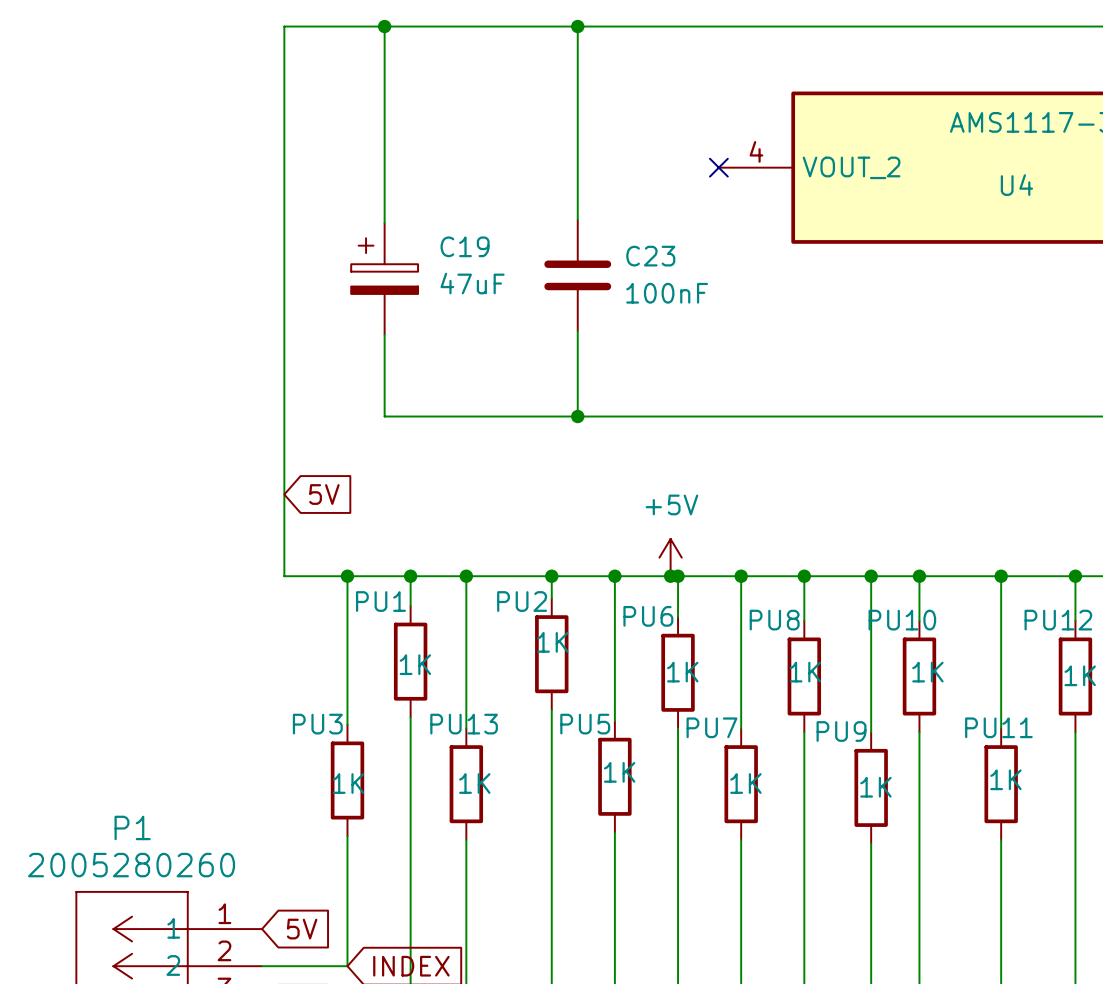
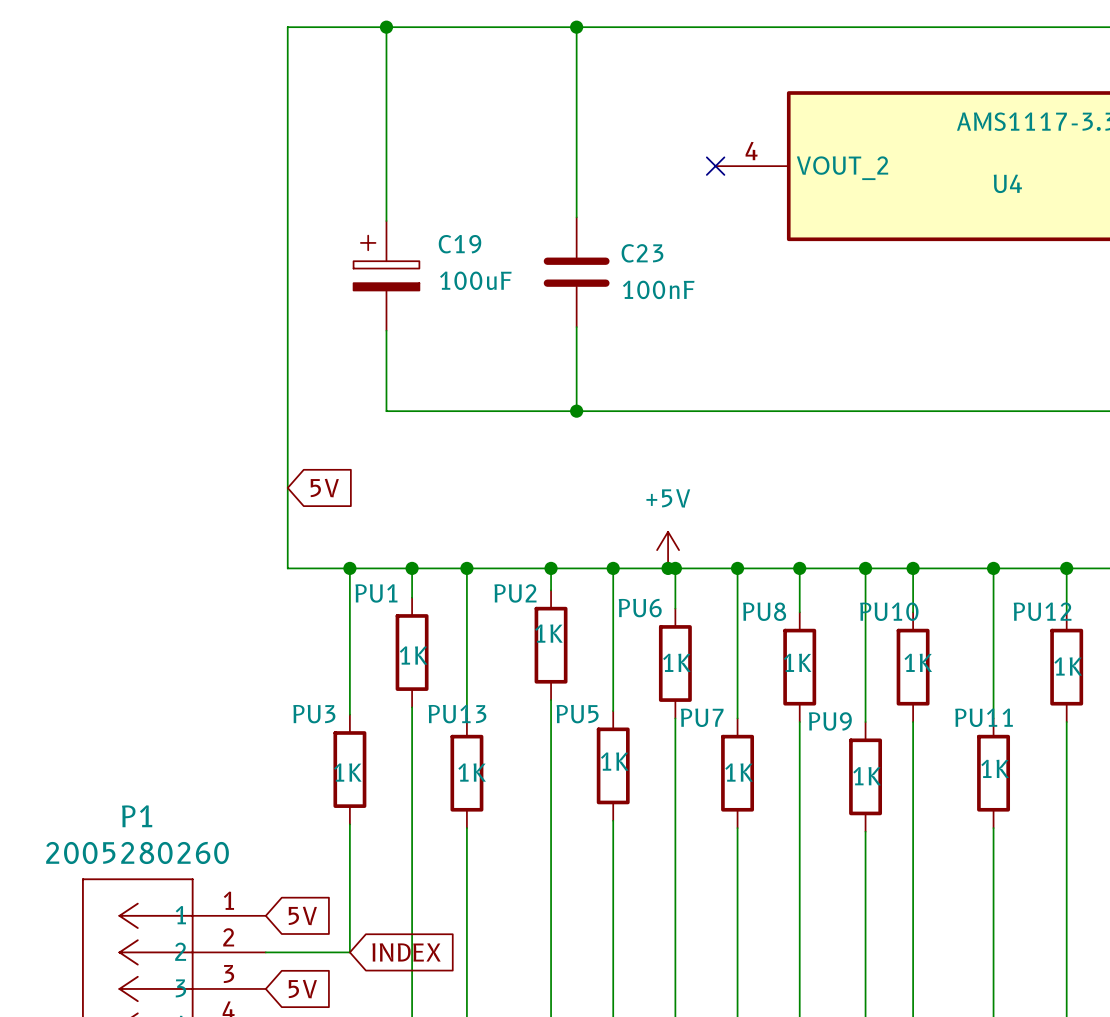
C19 value: 47uF (472, 283) -> 100uF (475, 280)

